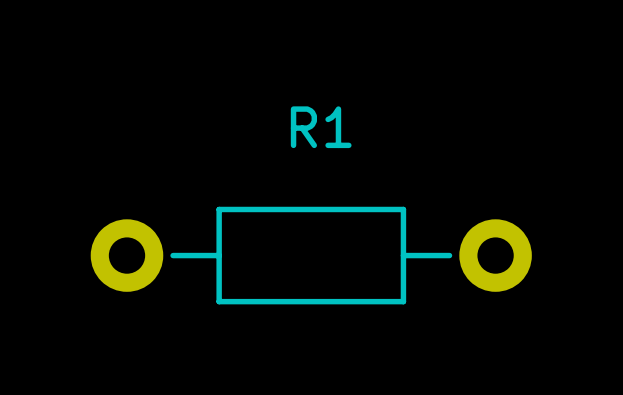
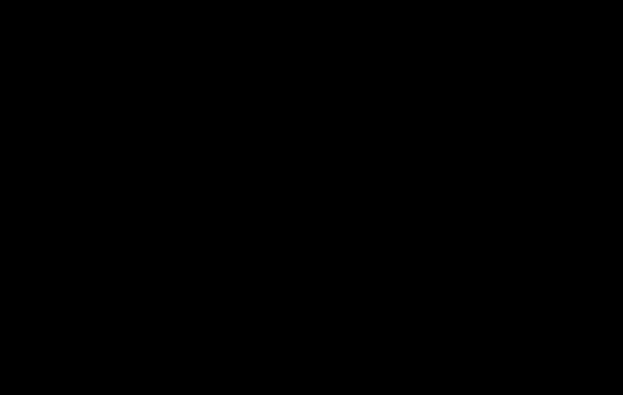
R1: (311, 255) -> none

